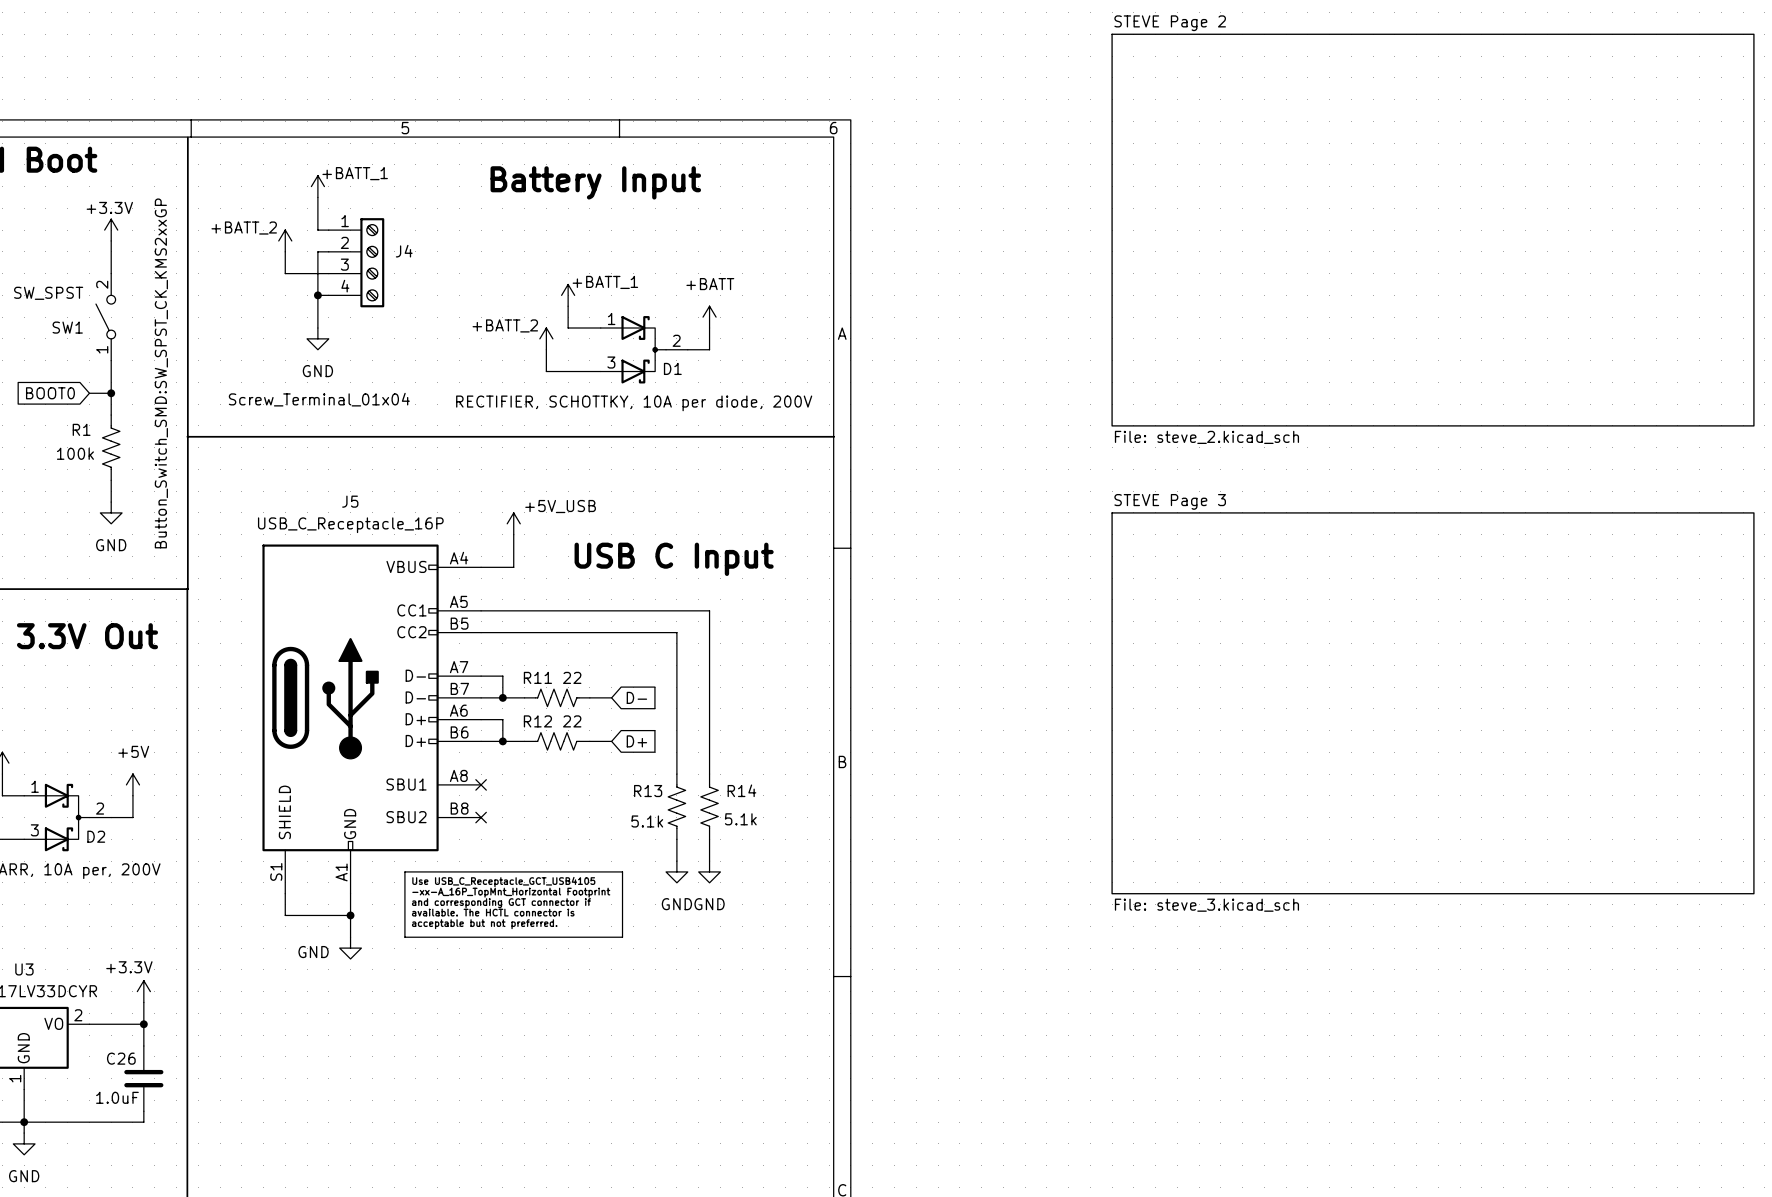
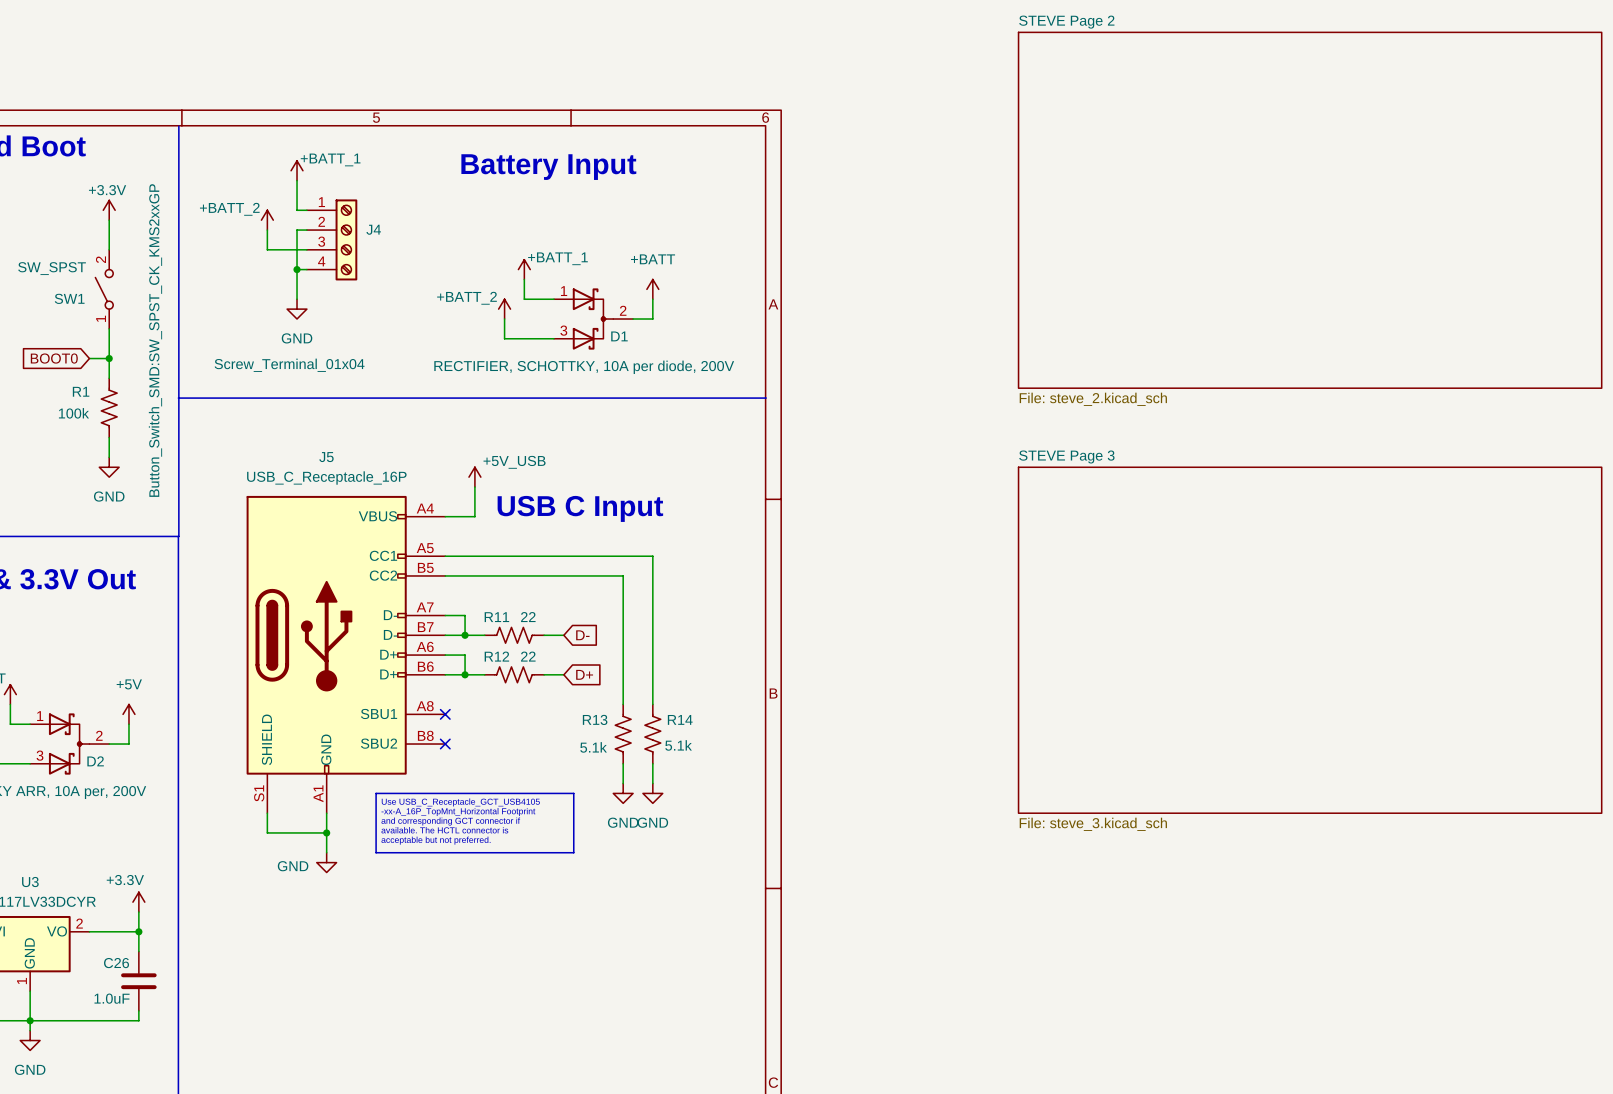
text position: USB C Input (674, 559) -> USB C Input (580, 508)

